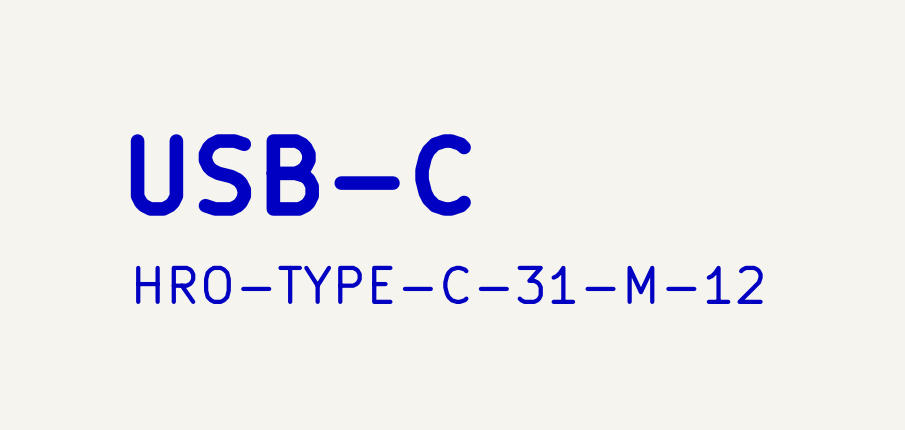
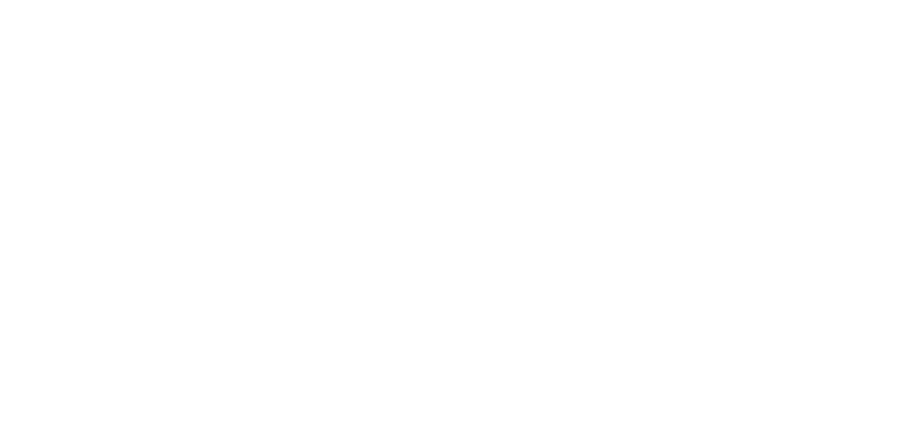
text: USB-C (300, 174) -> none
text: HRO-TYPE-C-31-M-12 (449, 284) -> none

